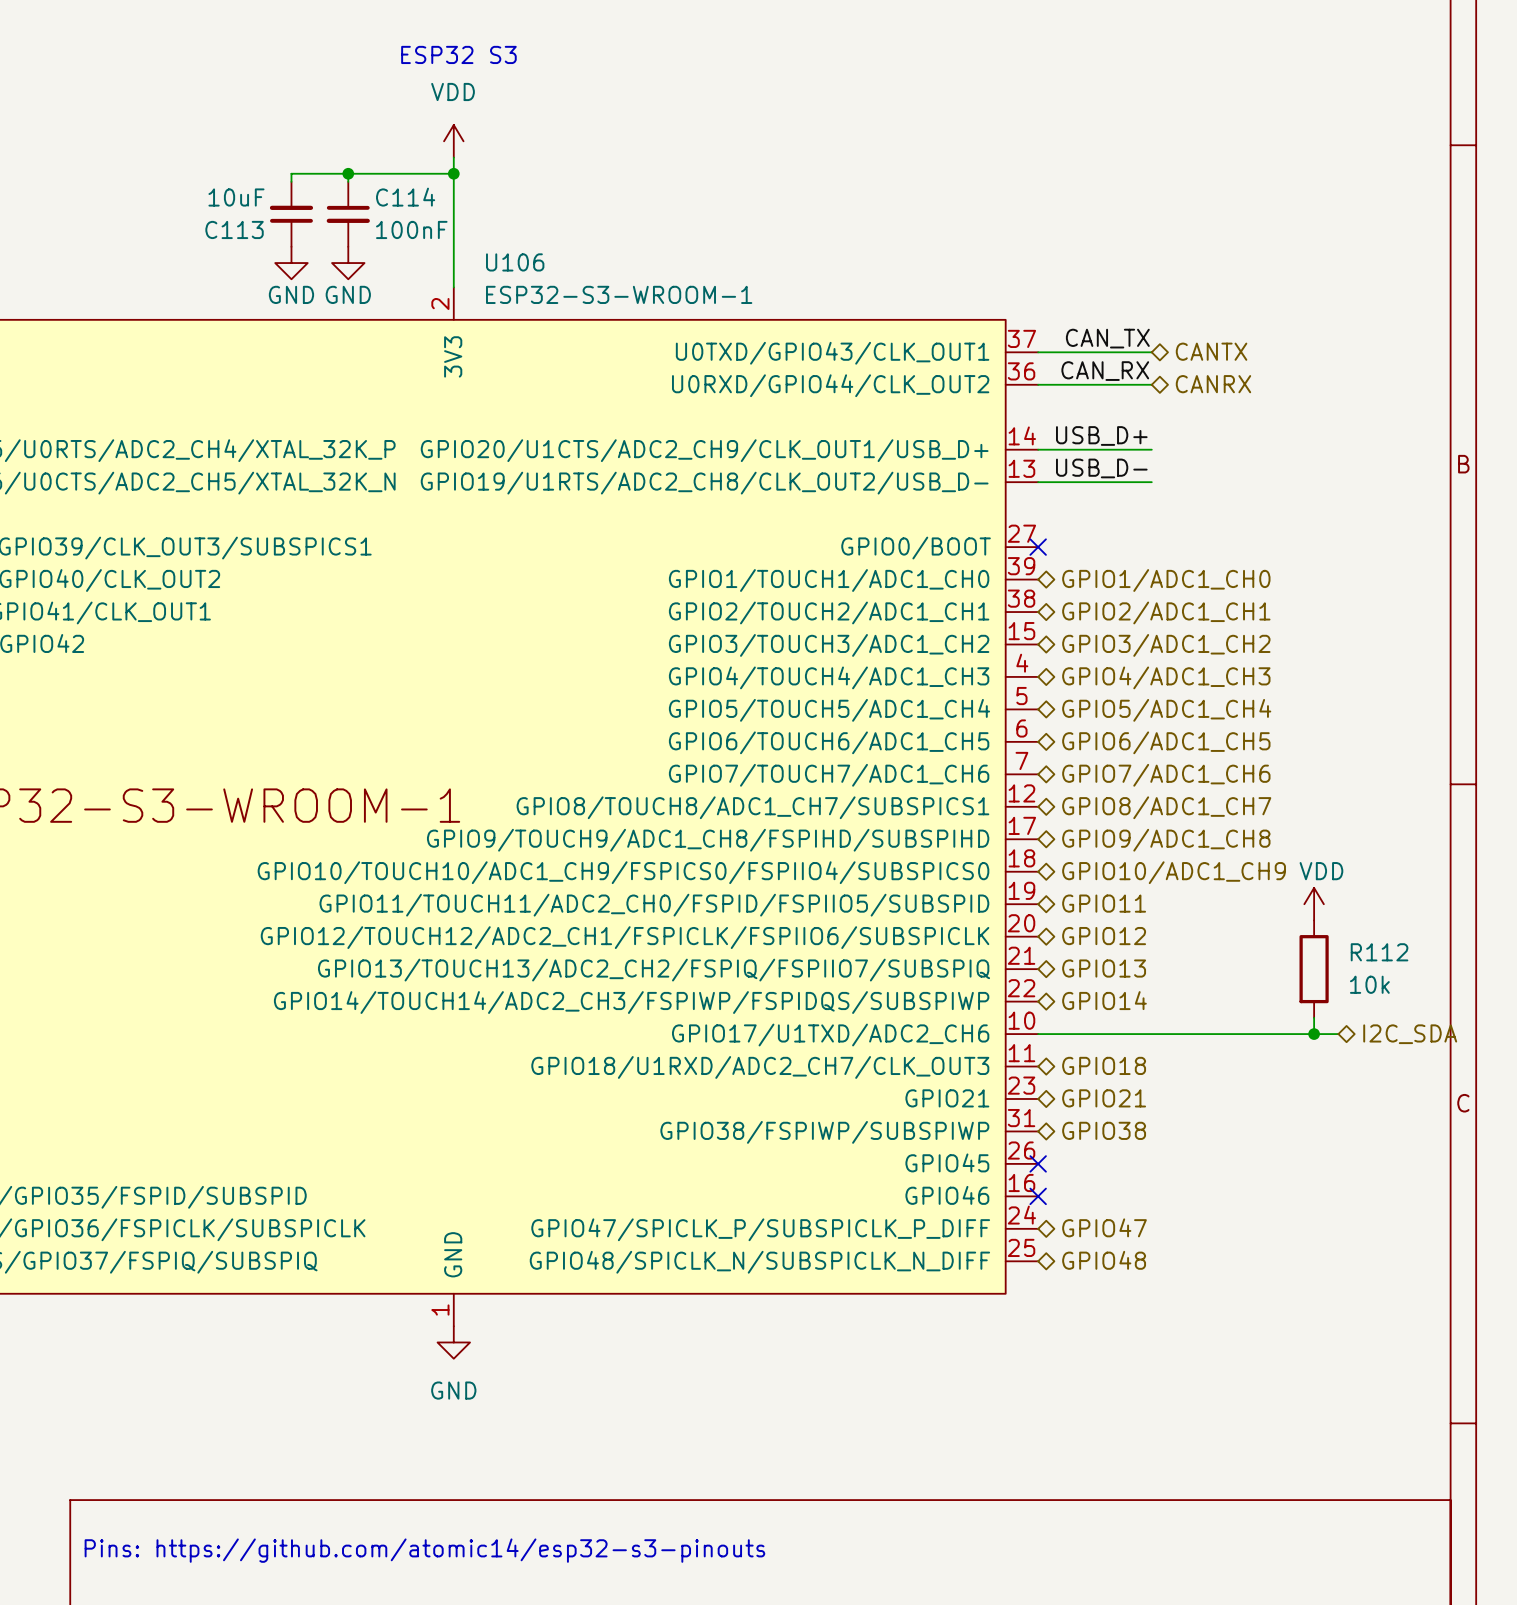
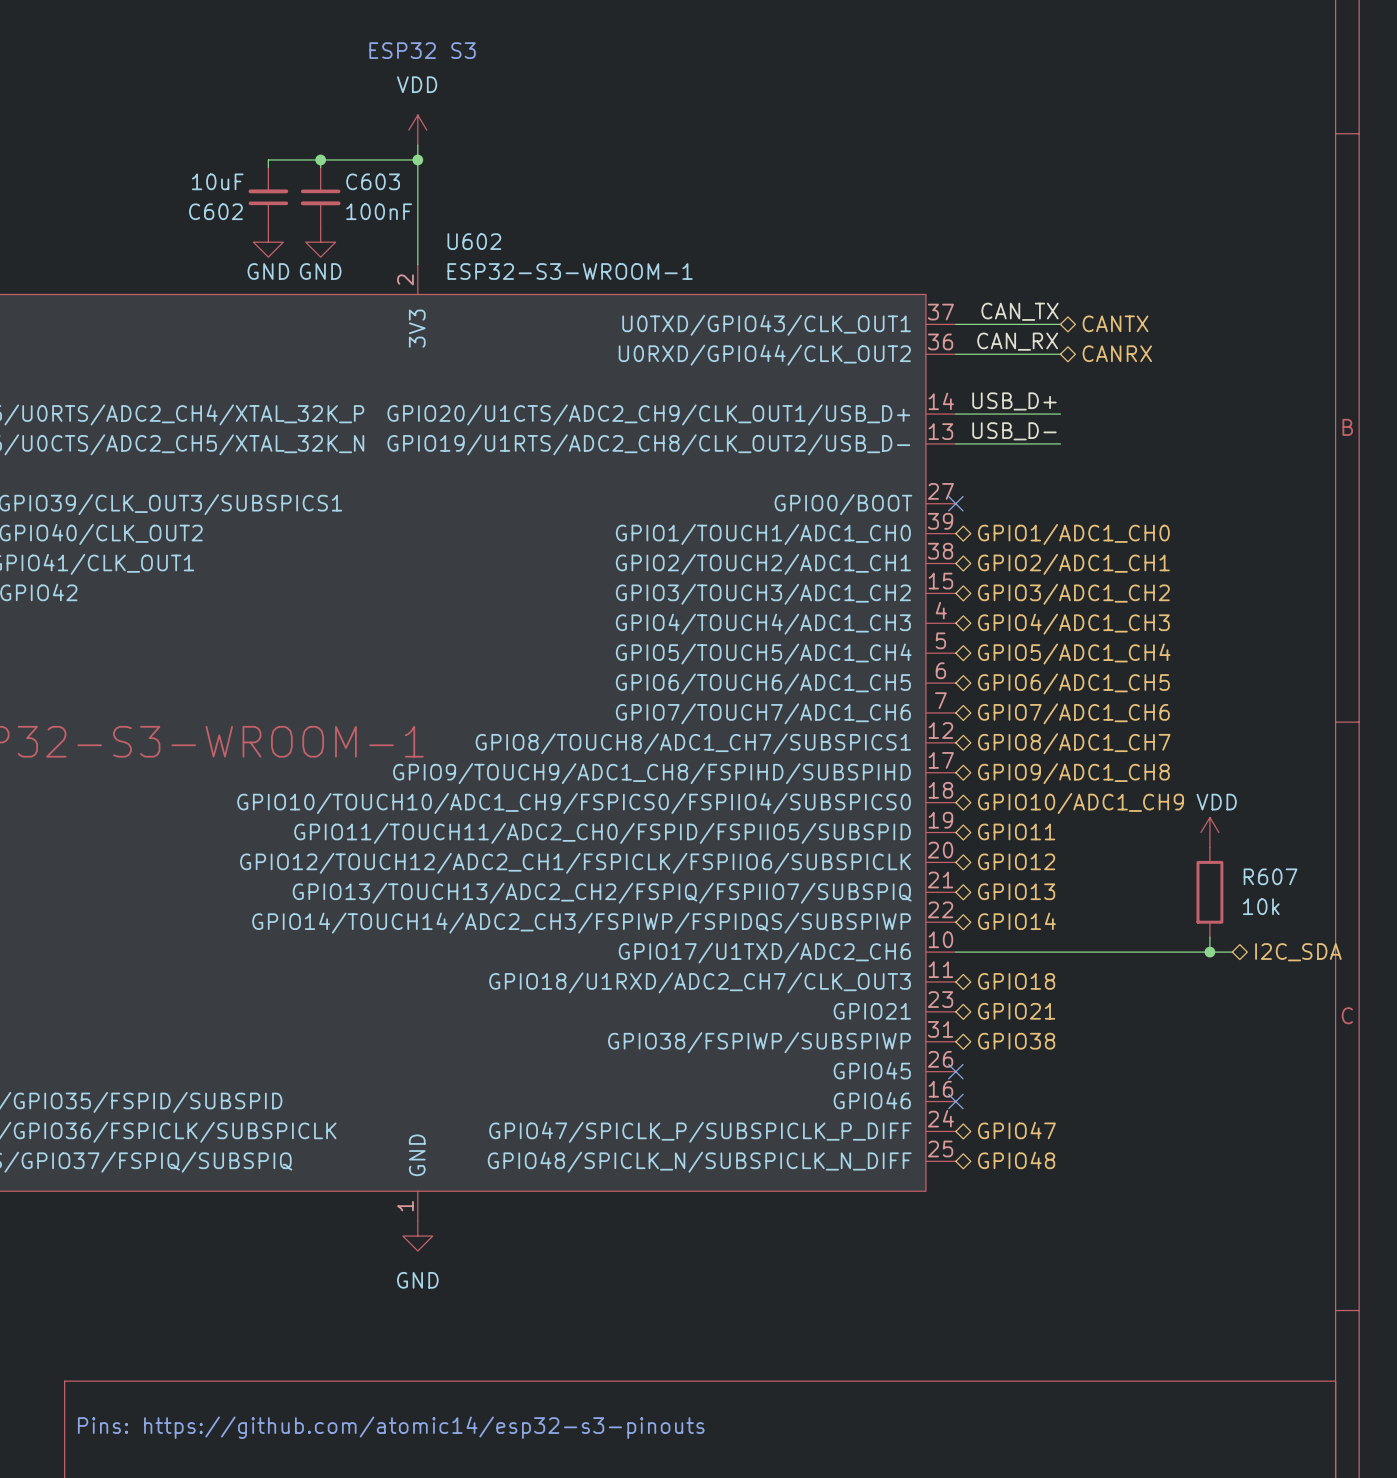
C114 name: C114 (405, 197) -> C603 (373, 181)
C113 name: C113 (234, 229) -> C602 (215, 211)
U106 name: U106 (515, 262) -> U602 (474, 241)
R112 name: R112 (1379, 952) -> R607 (1270, 876)

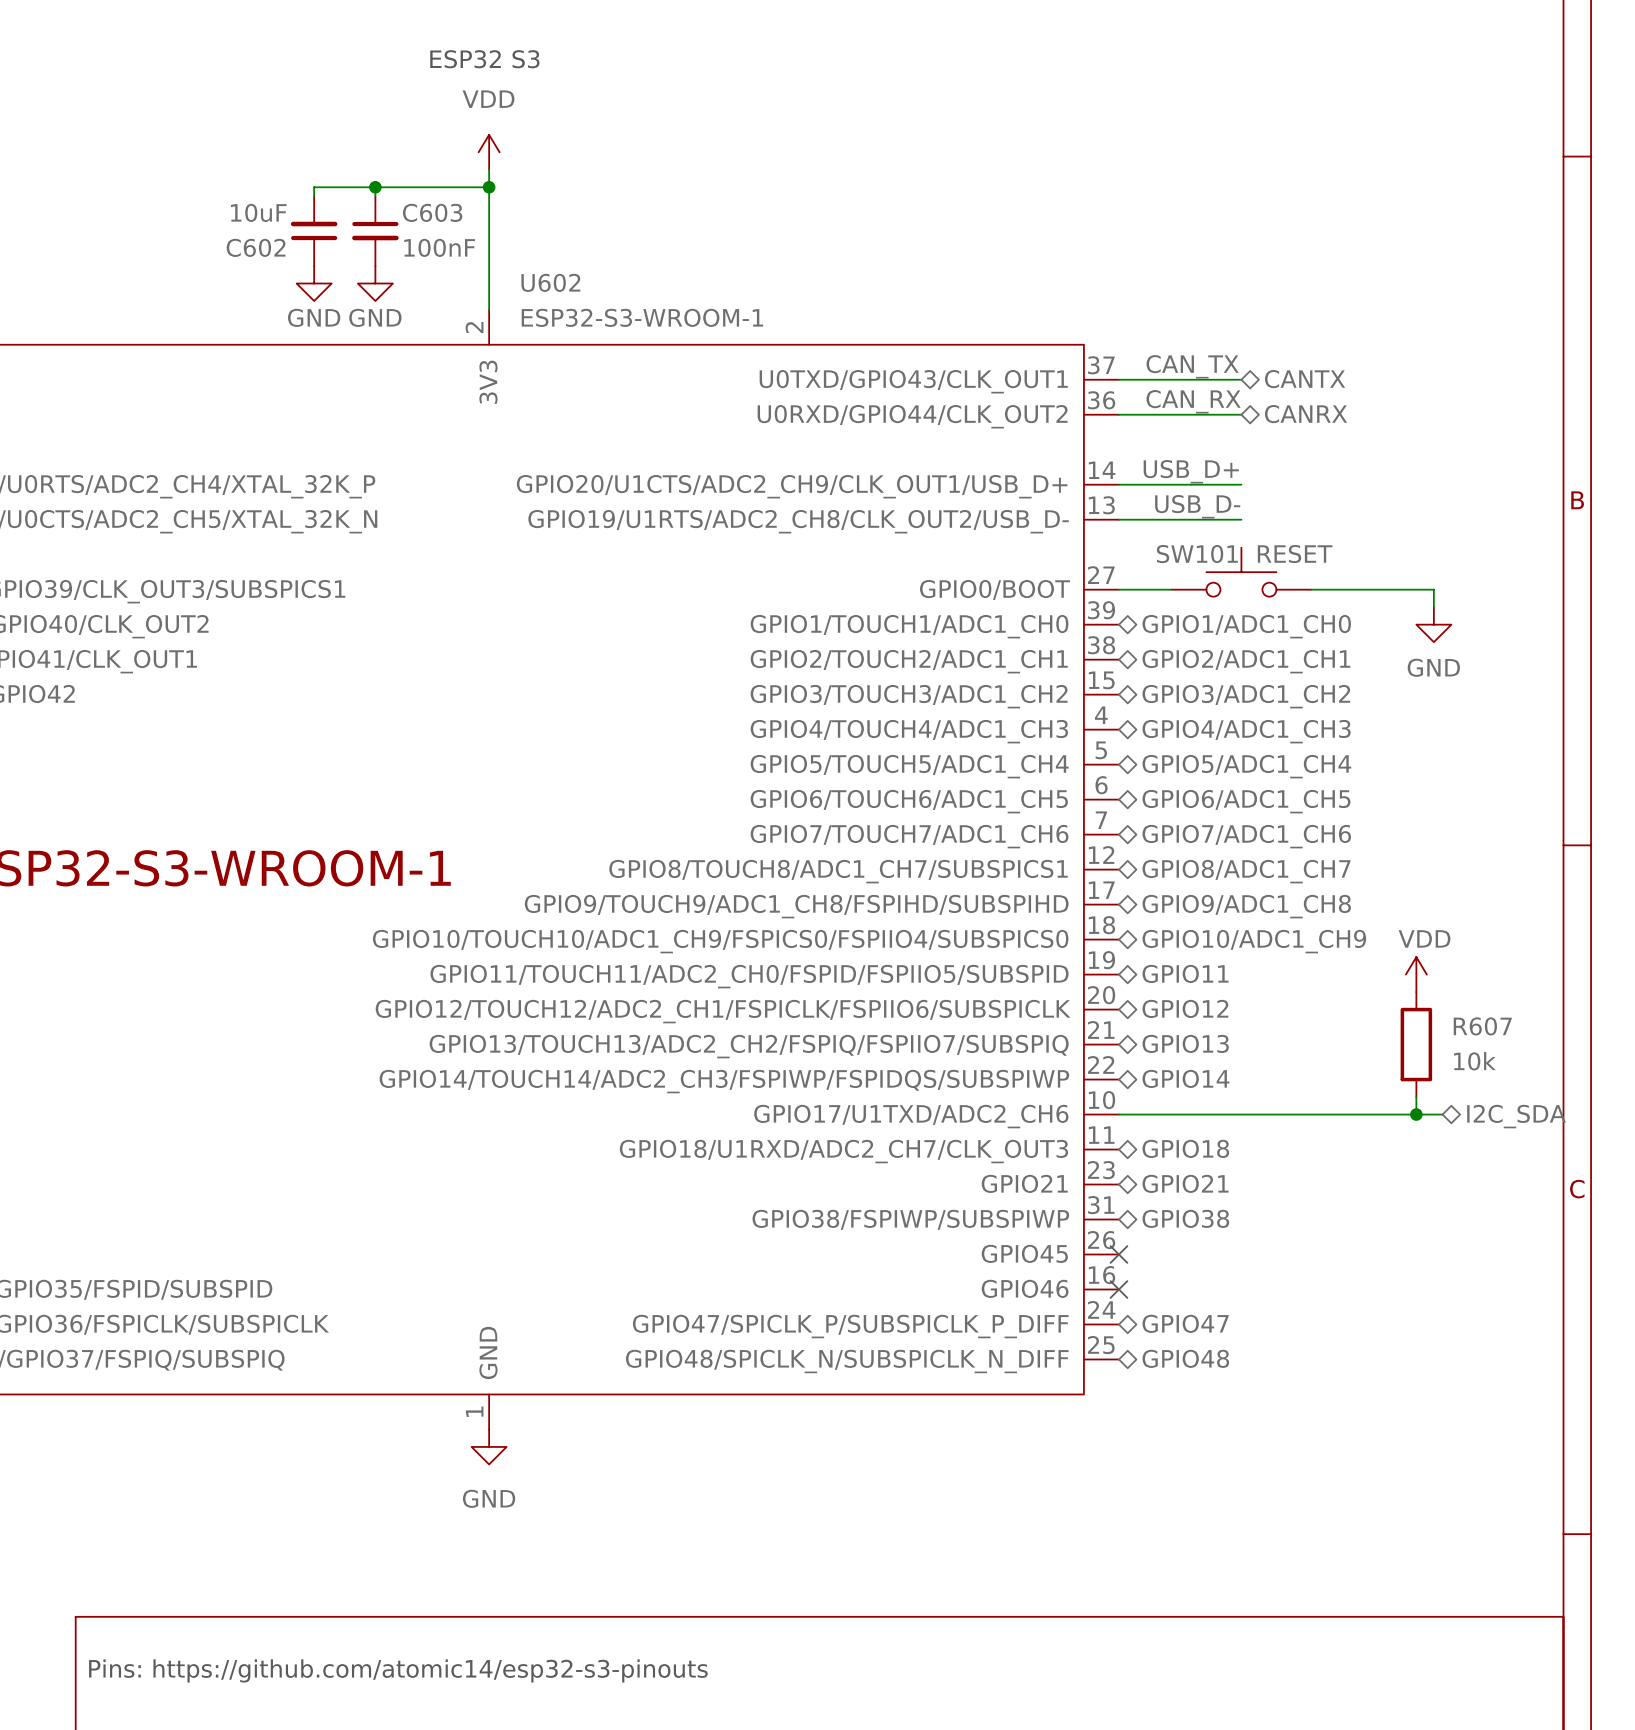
SW101: none -> RESET (1241, 572)
wire: none -> (1118, 589) (1171, 589)
no-connect mark: (955, 503) -> none
wire: none -> (1311, 589) (1433, 589) (1433, 607)
power symbol: none -> GND (1433, 624)

